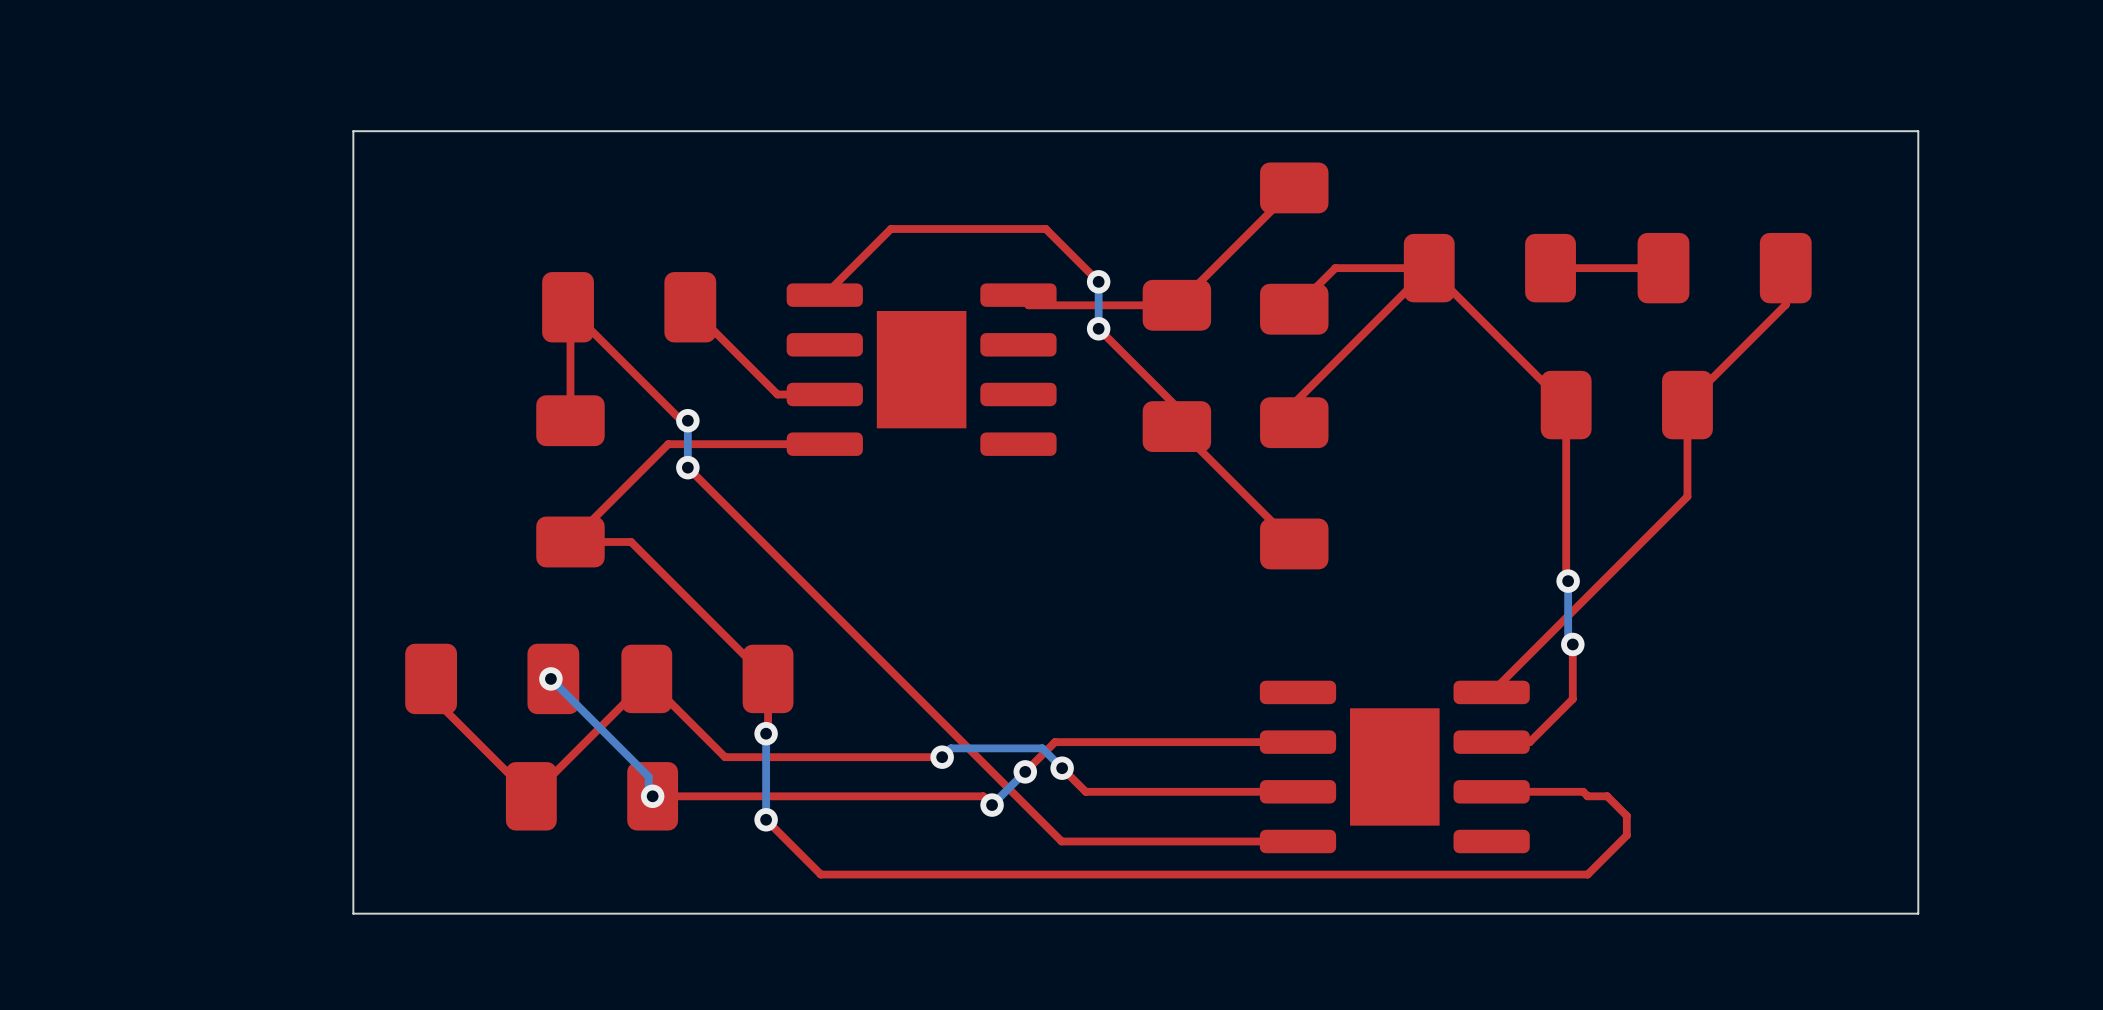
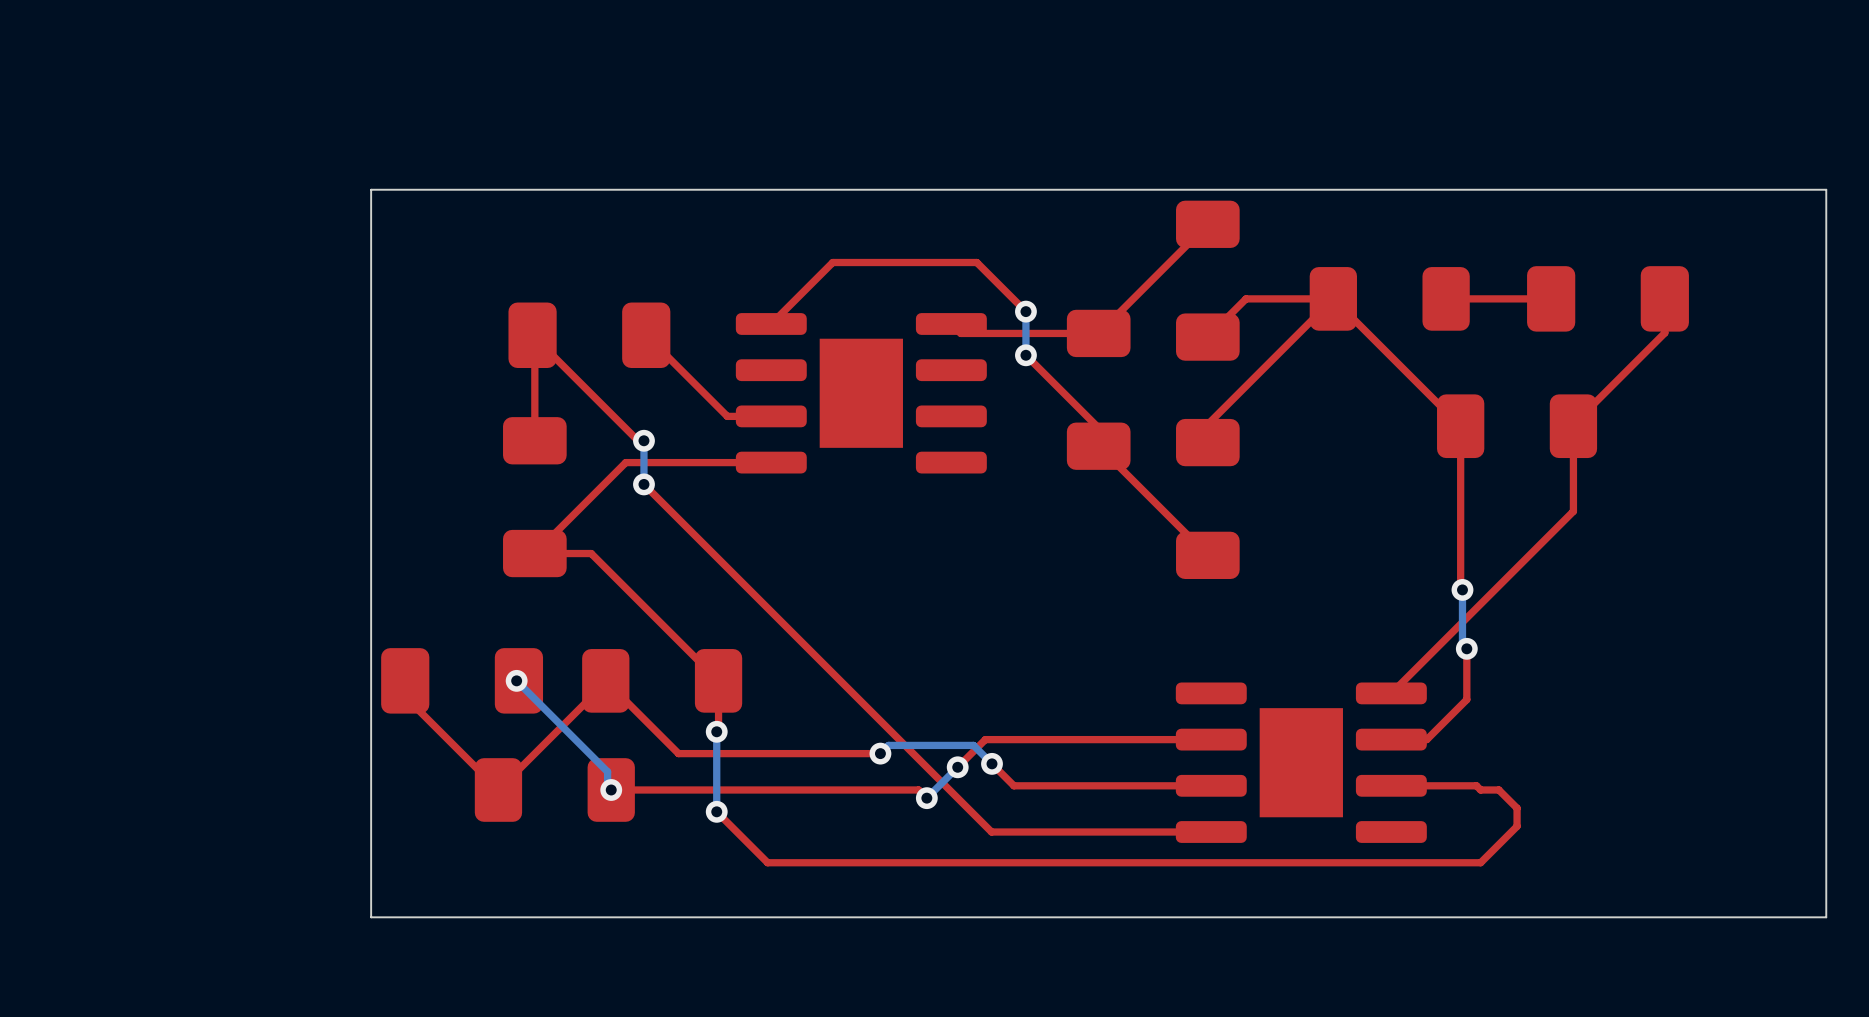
board edge: (1918, 131) (353, 131) (353, 913) (1918, 913) (1918, 131) -> (1826, 189) (1826, 917) (371, 917) (371, 189) (1826, 189)

